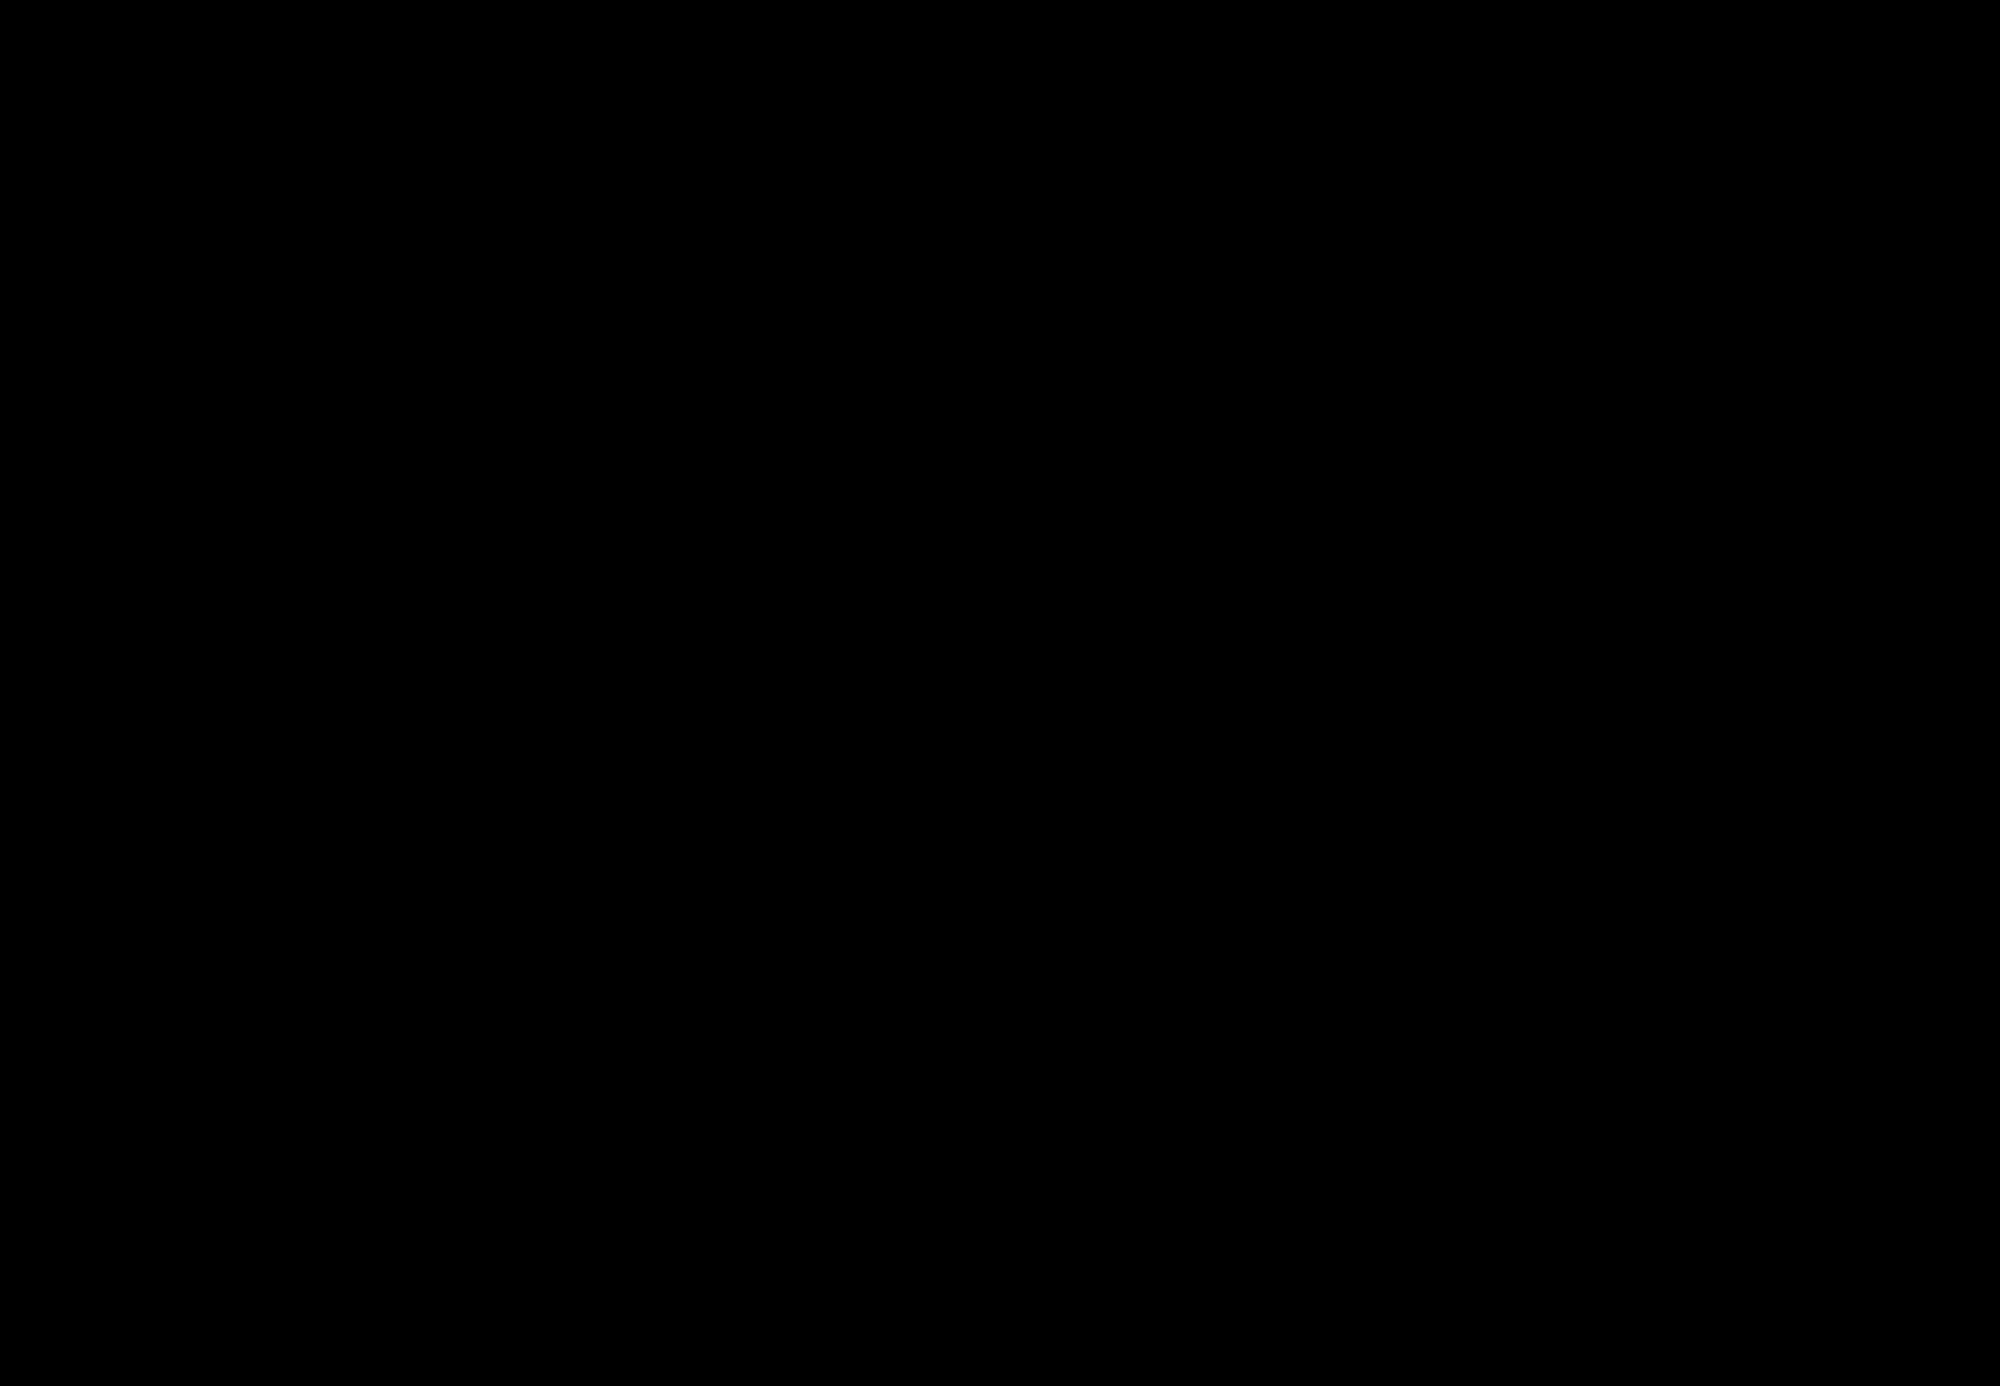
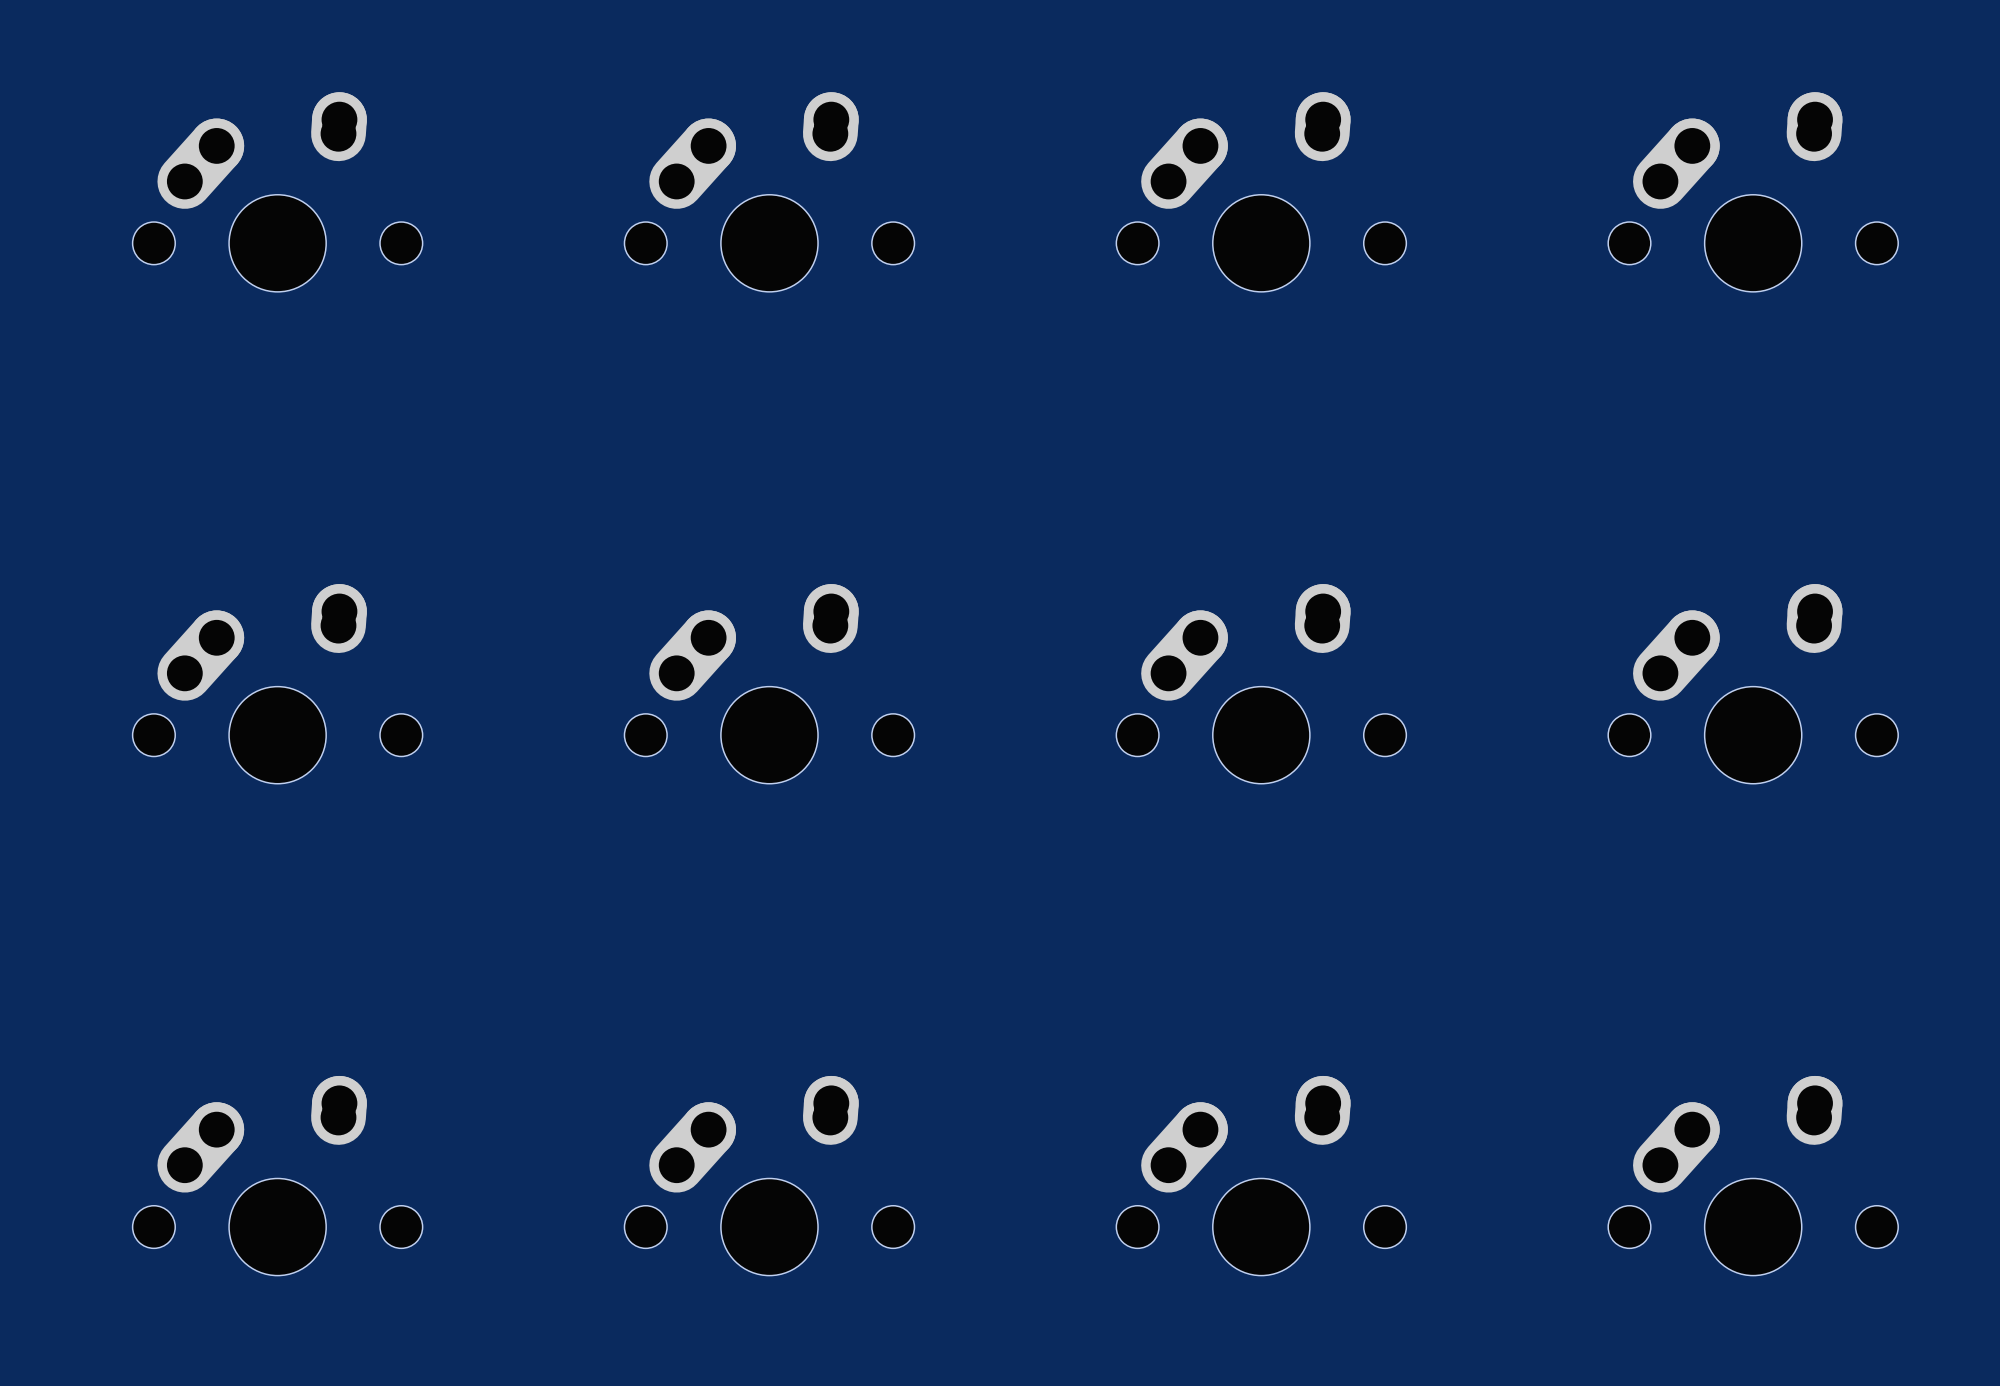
part: none -> (277, 192)
part: none -> (769, 192)
part: none -> (1261, 192)
part: none -> (1753, 192)
part: none -> (277, 683)
part: none -> (769, 683)
part: none -> (1261, 683)
part: none -> (1753, 683)
part: none -> (277, 1175)
part: none -> (769, 1175)
part: none -> (1261, 1175)
part: none -> (1753, 1175)

